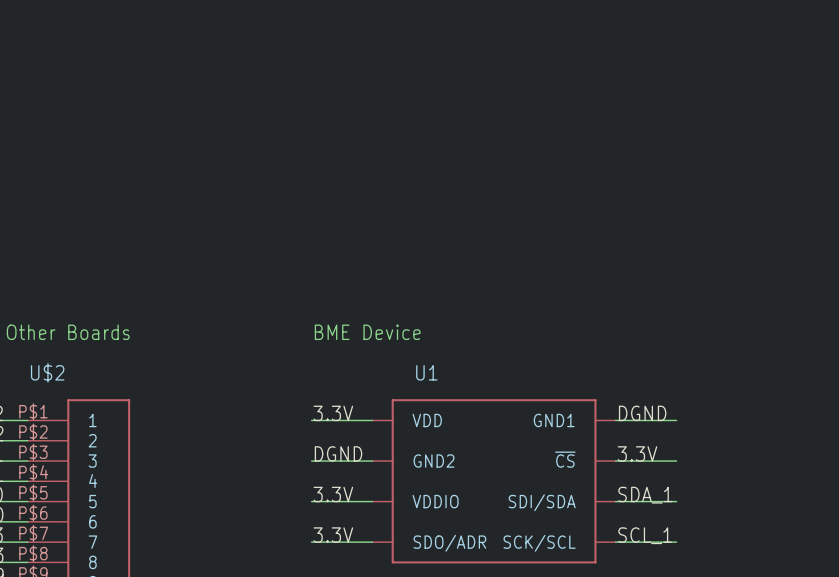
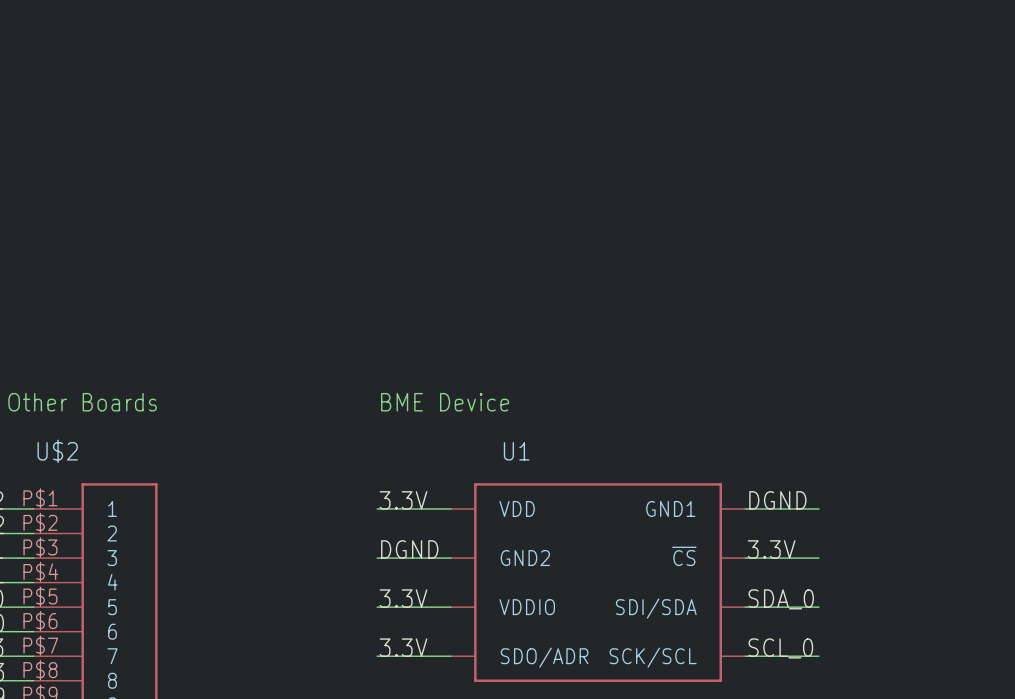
label: SDA_1 (645, 495) -> SDA_0 (781, 599)
label: SCL_1 (645, 535) -> SCL_0 (780, 648)

